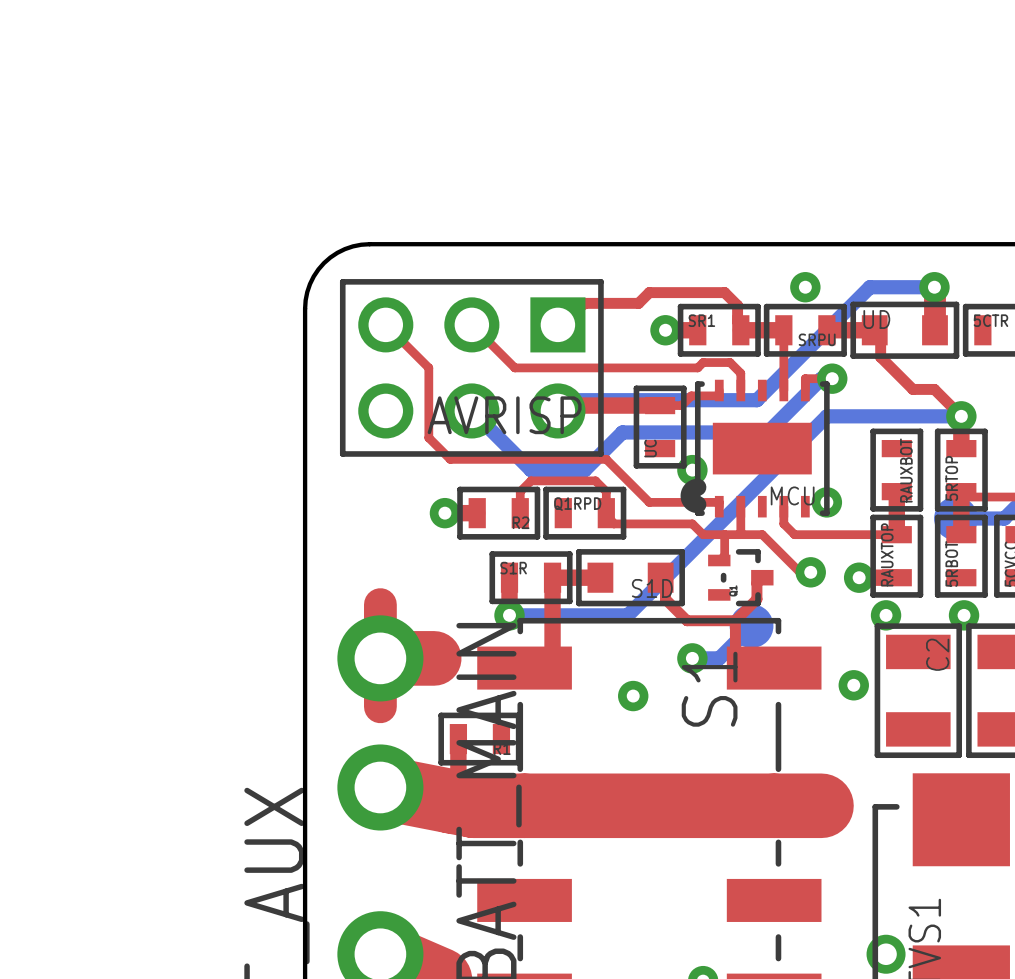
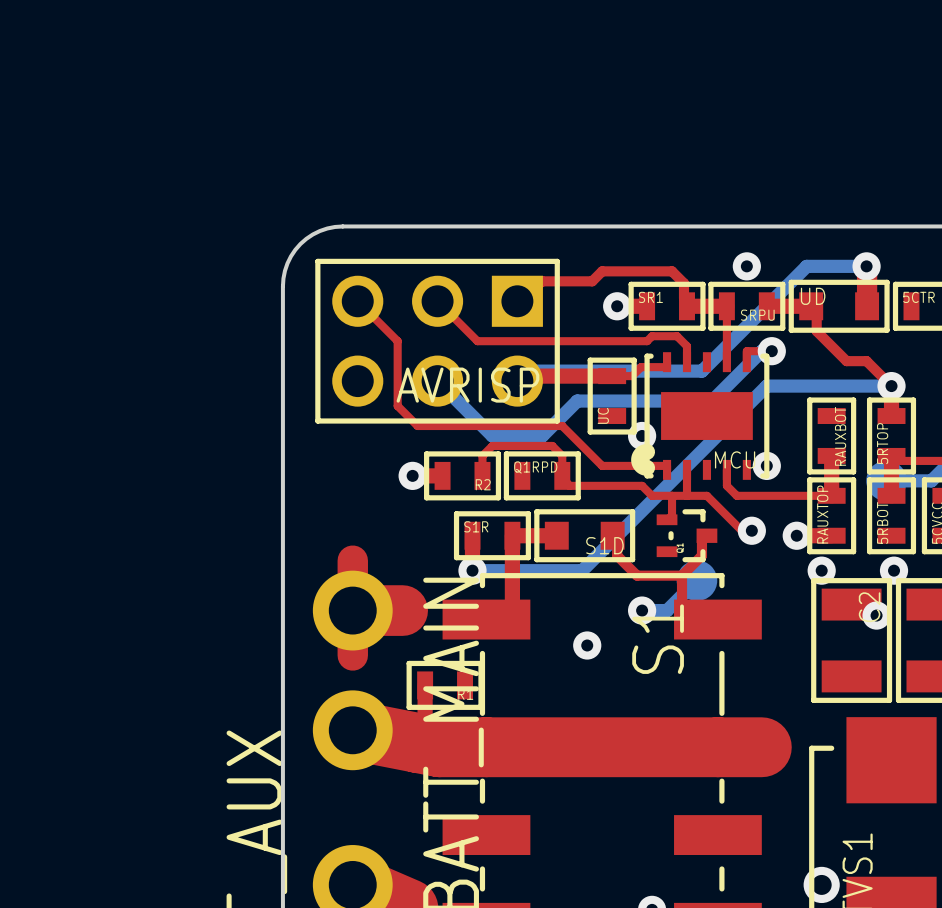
via position: (853, 685) -> (876, 615)

